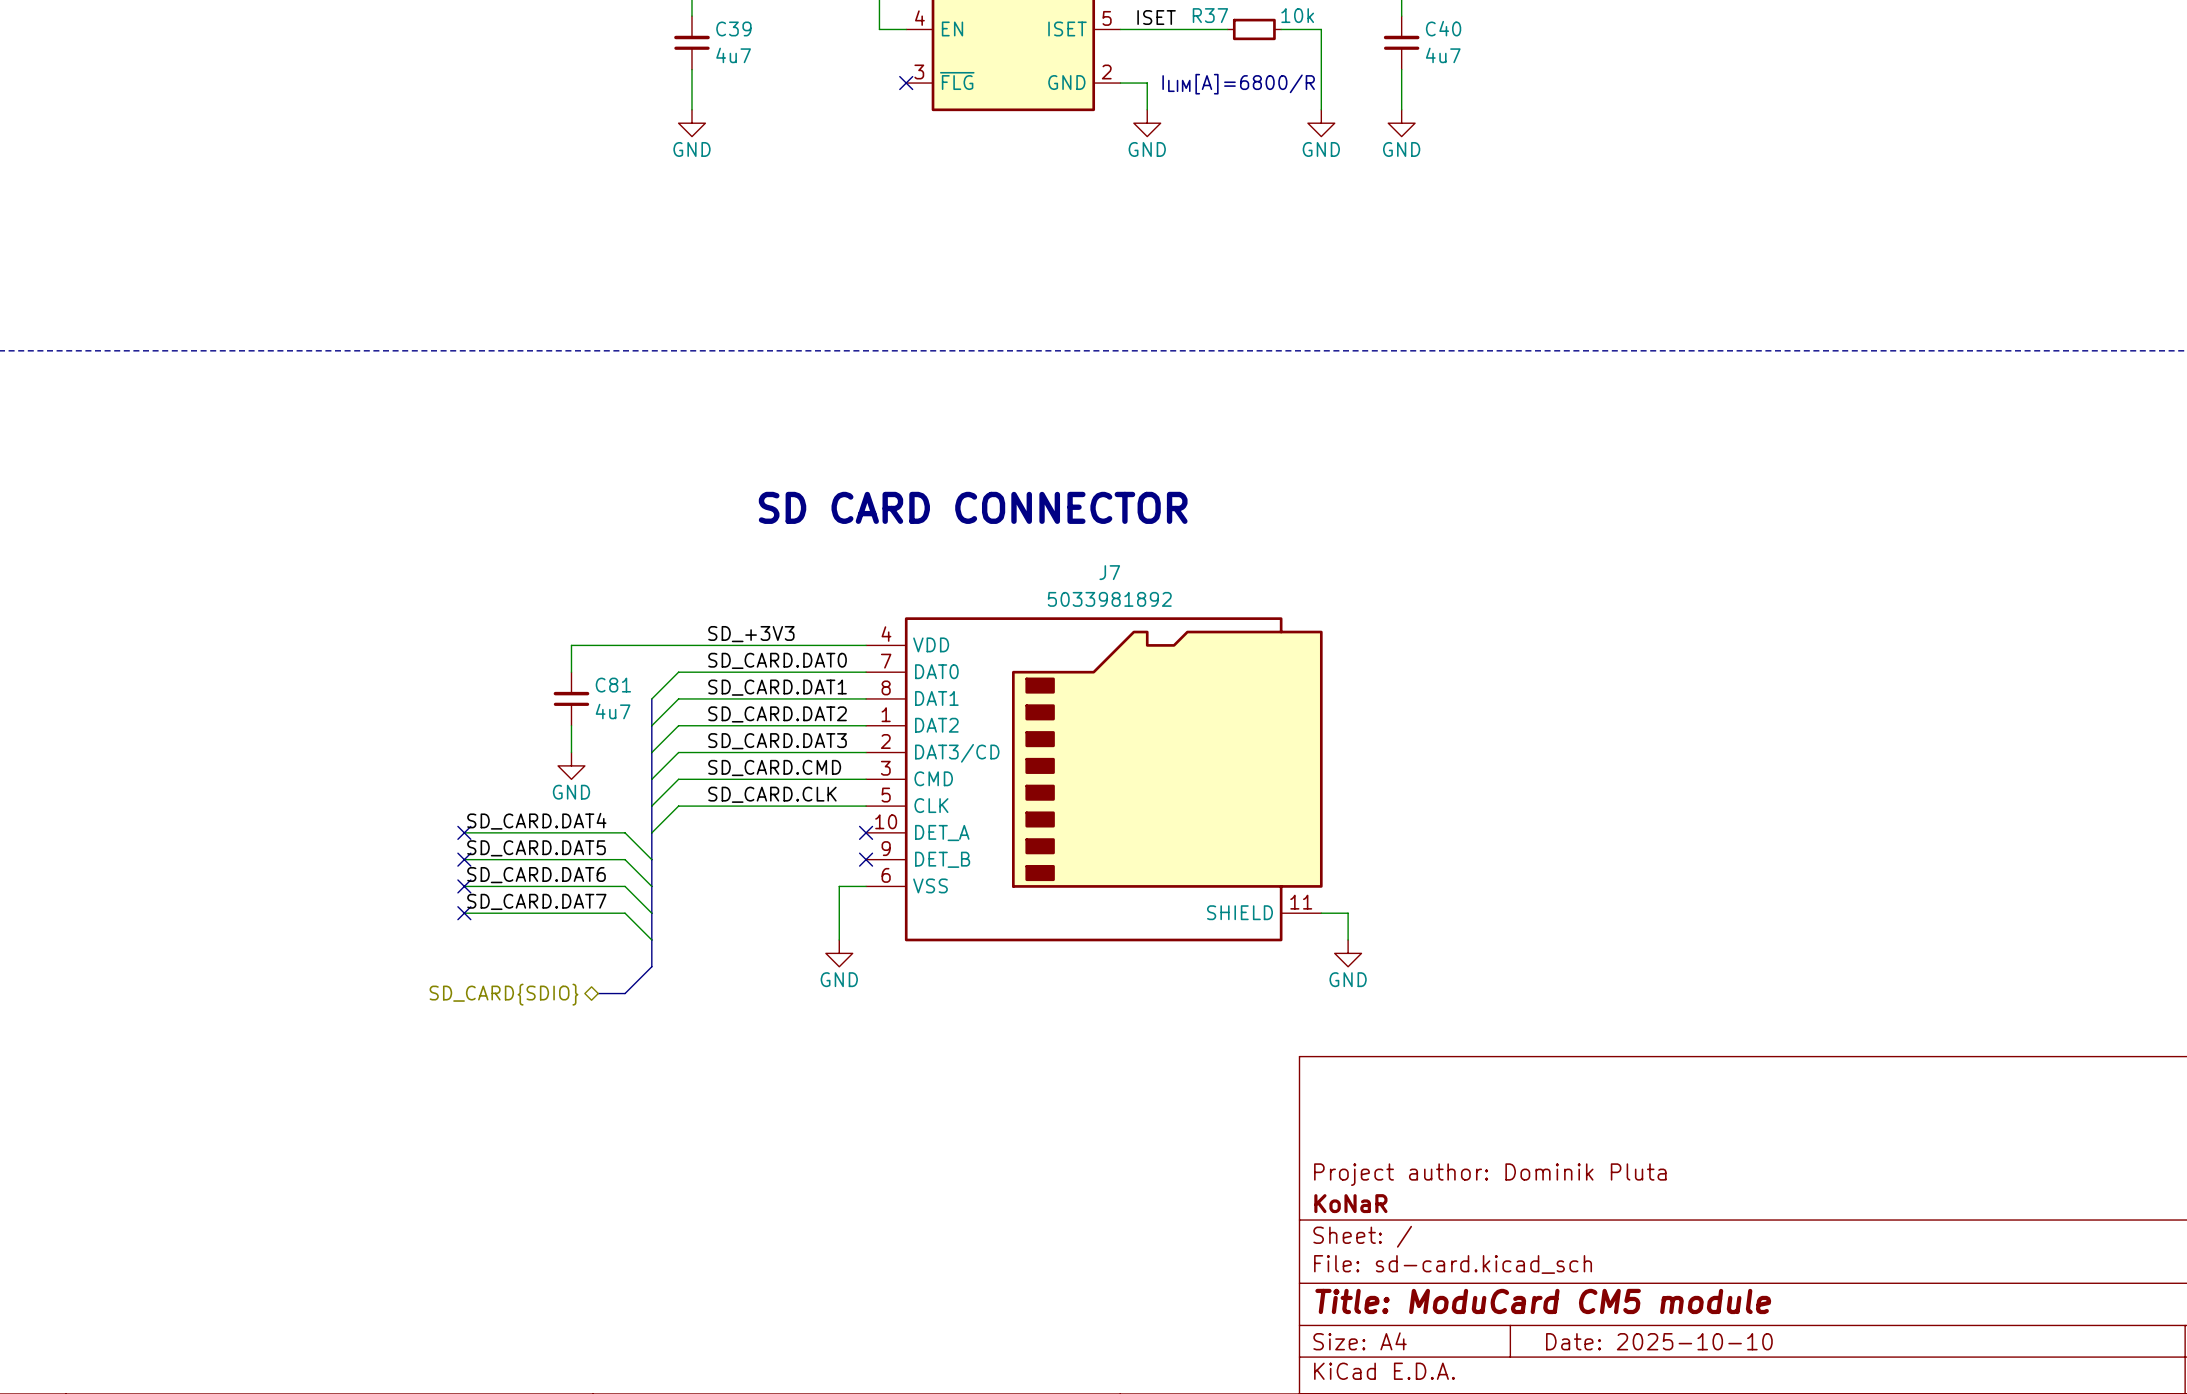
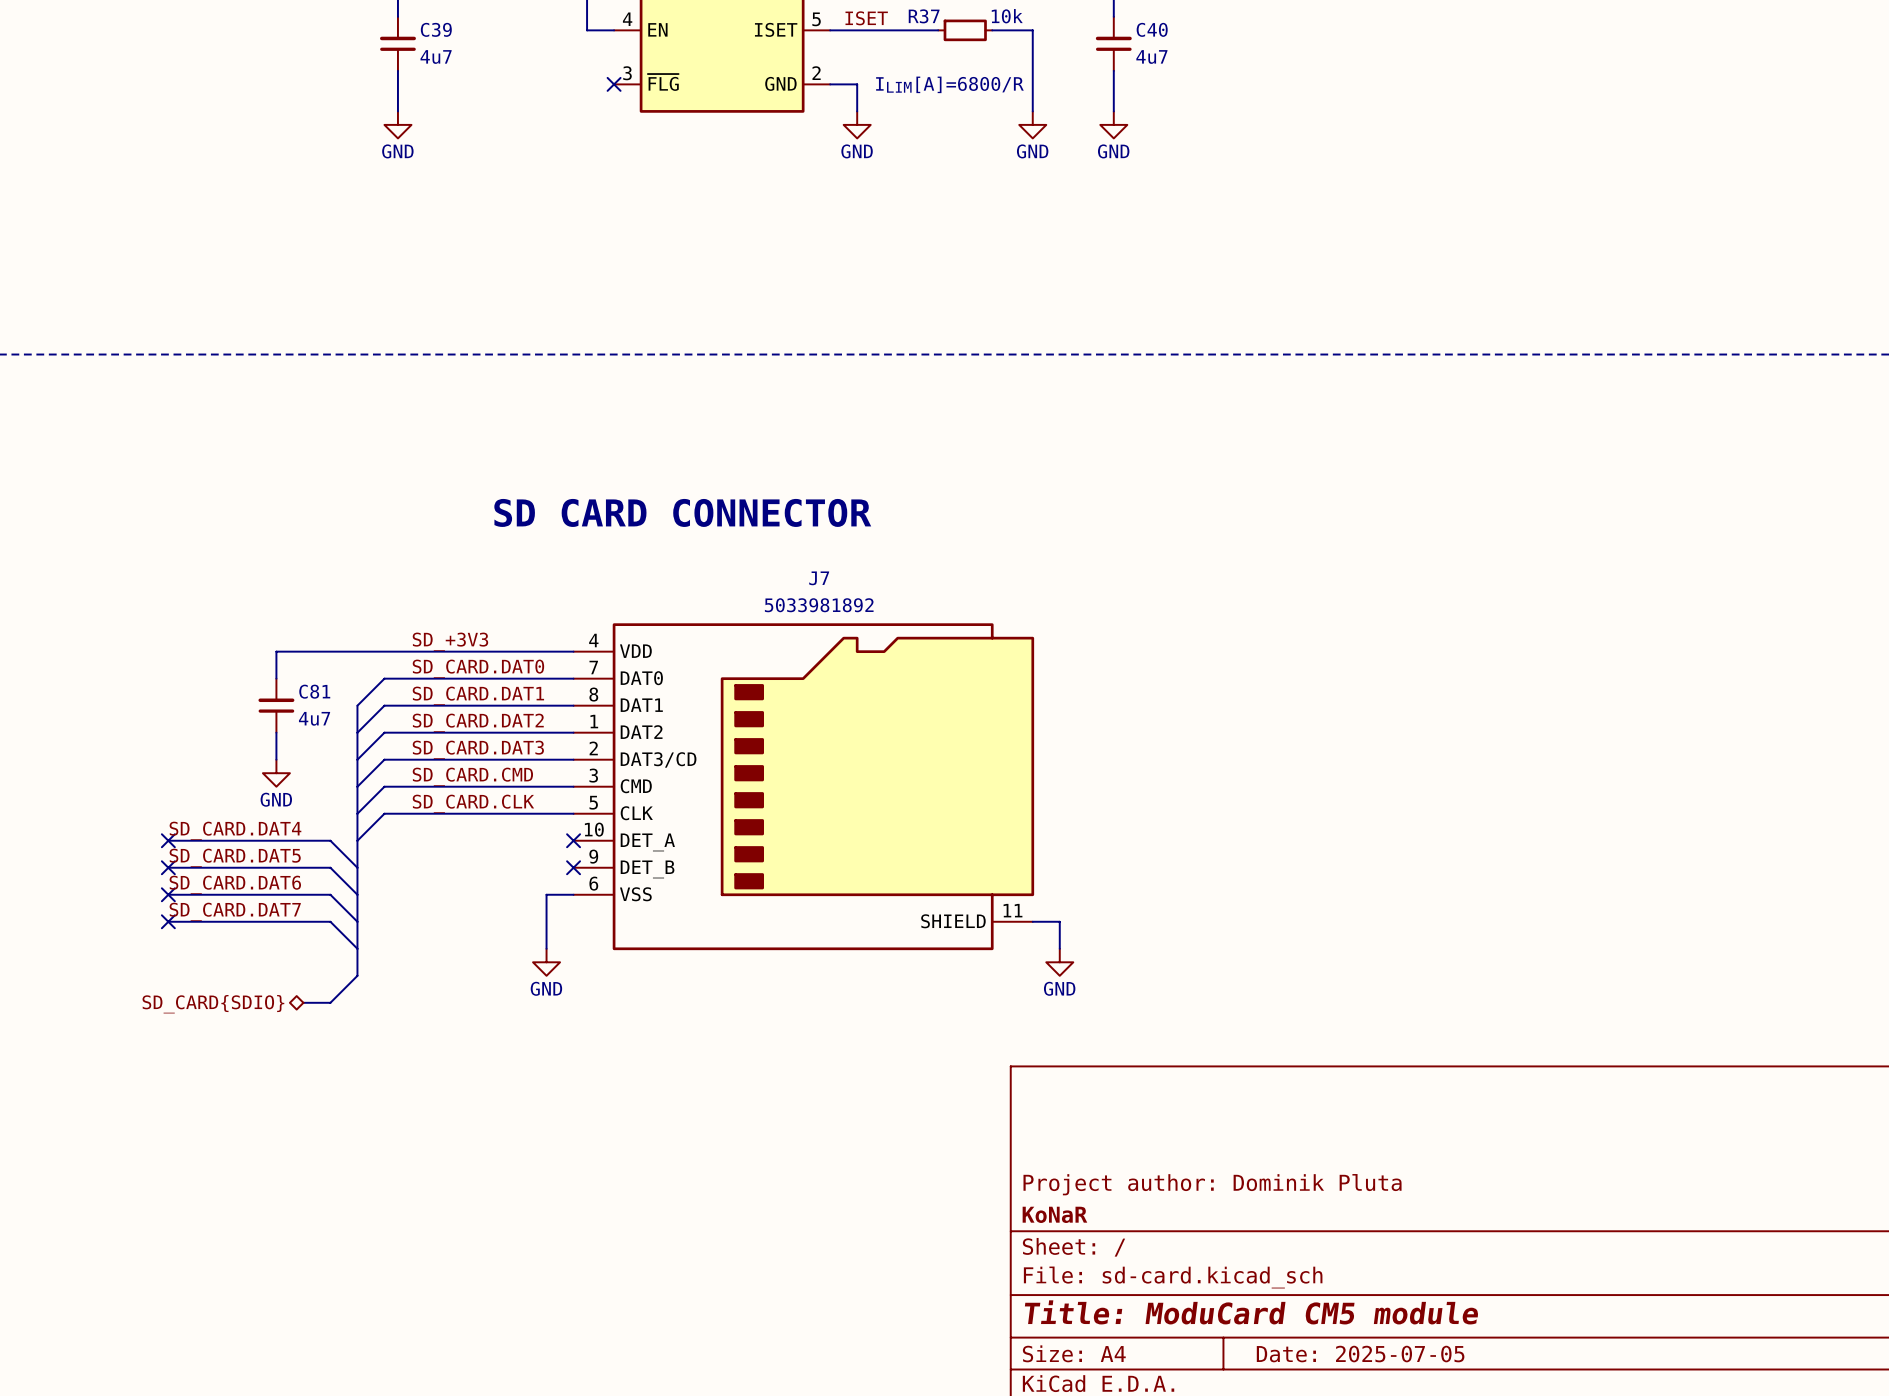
title block: Date: 2025-10-10 (1659, 1341) -> Date: 2025-07-05 (1360, 1354)

